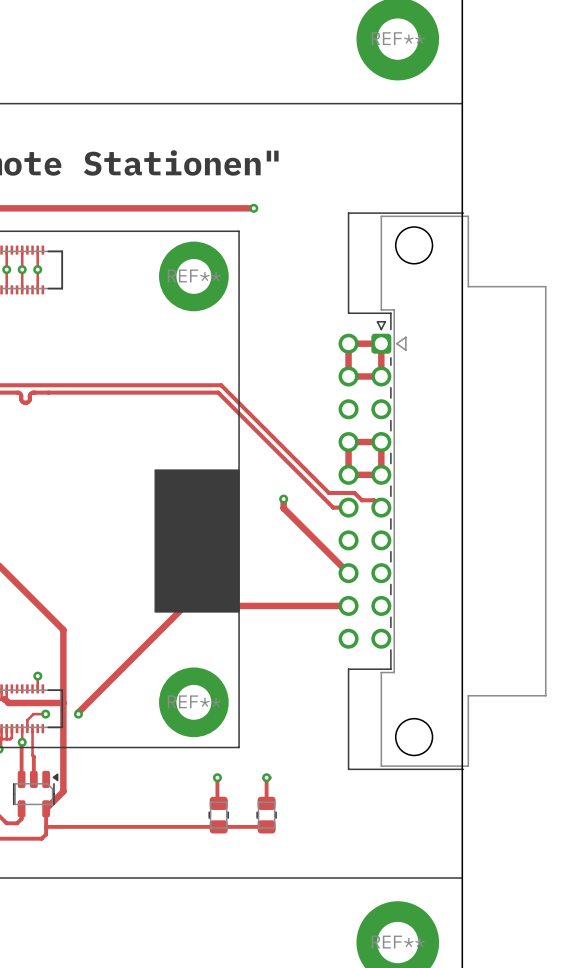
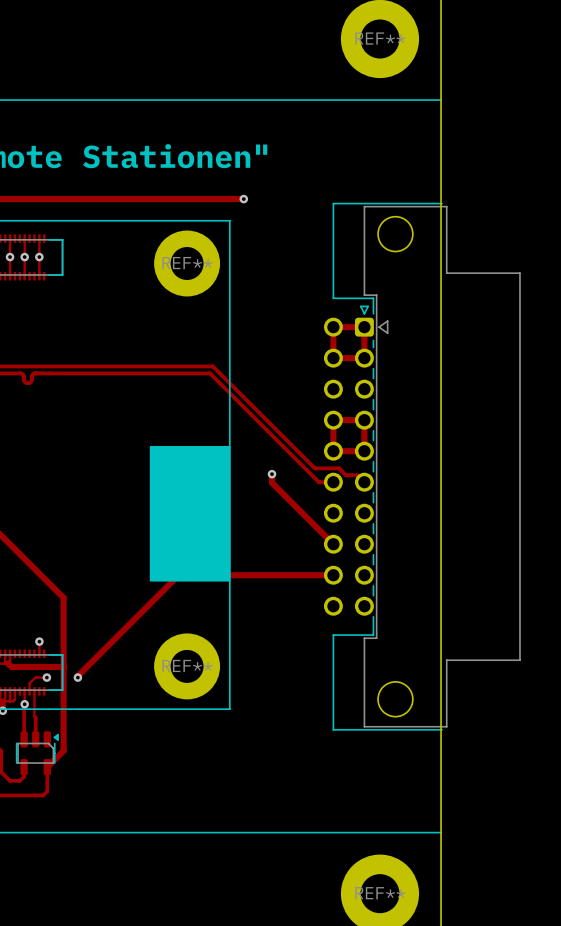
track: (217, 777) (218, 803) -> none
via: (217, 777) -> none
via: (266, 777) -> none
track: (269, 777) (266, 777) (266, 803) -> none
part: (218, 815) -> none
part: (266, 815) -> none
track: (46, 826) (266, 826) -> none

